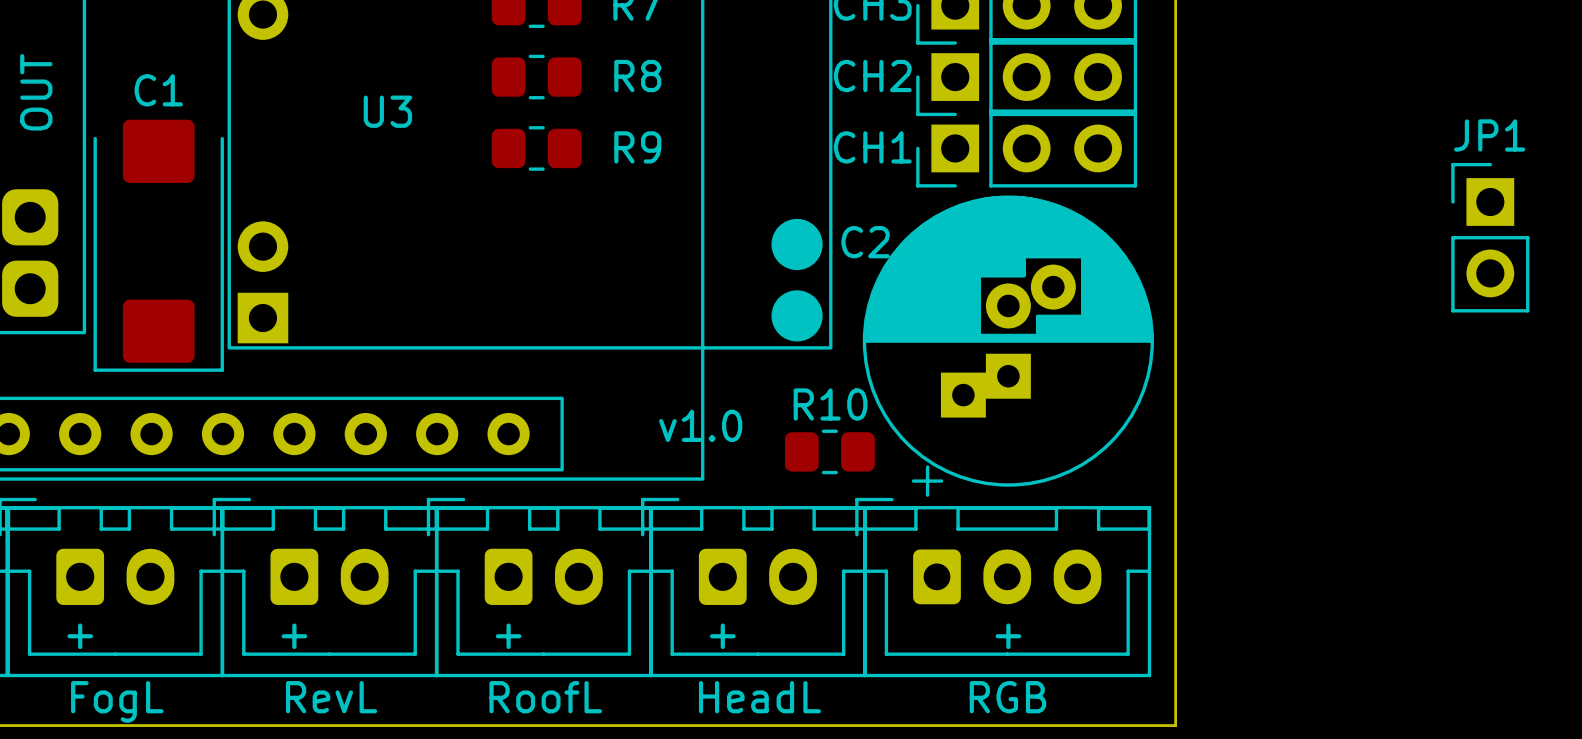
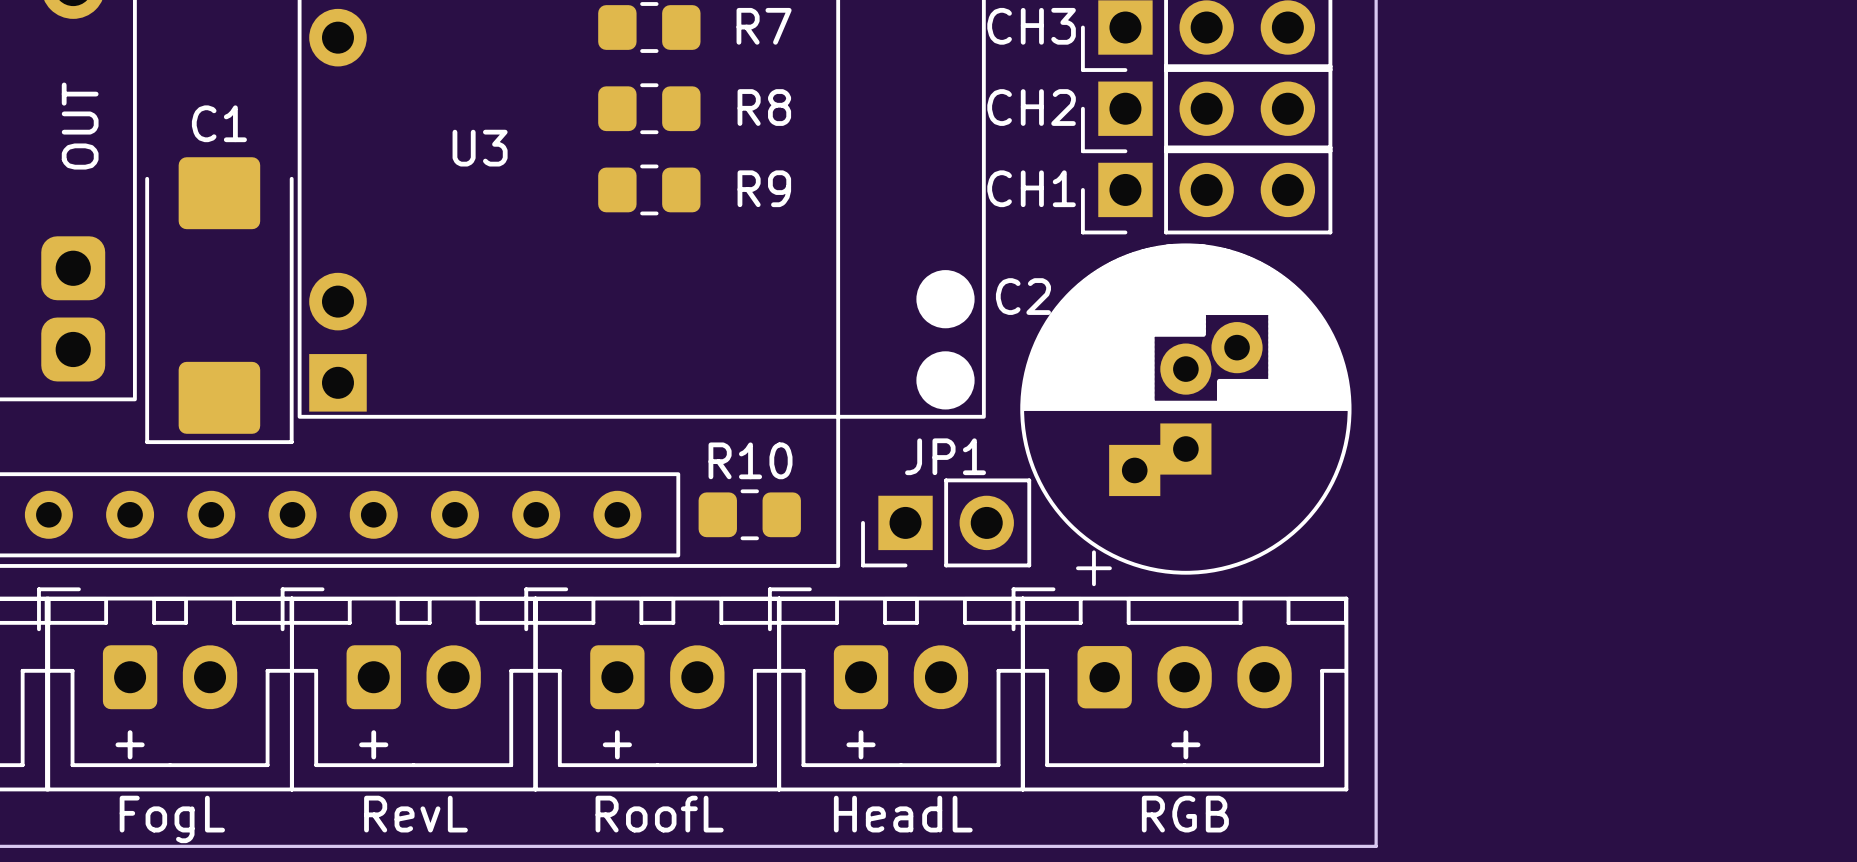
JP1 rotation: 0° (1490, 237) -> 90° counterclockwise (946, 522)
JP1 position: (1490, 237) -> (946, 522)
text: v1.0 (700, 425) -> none
R10 position: (829, 451) -> (749, 514)

